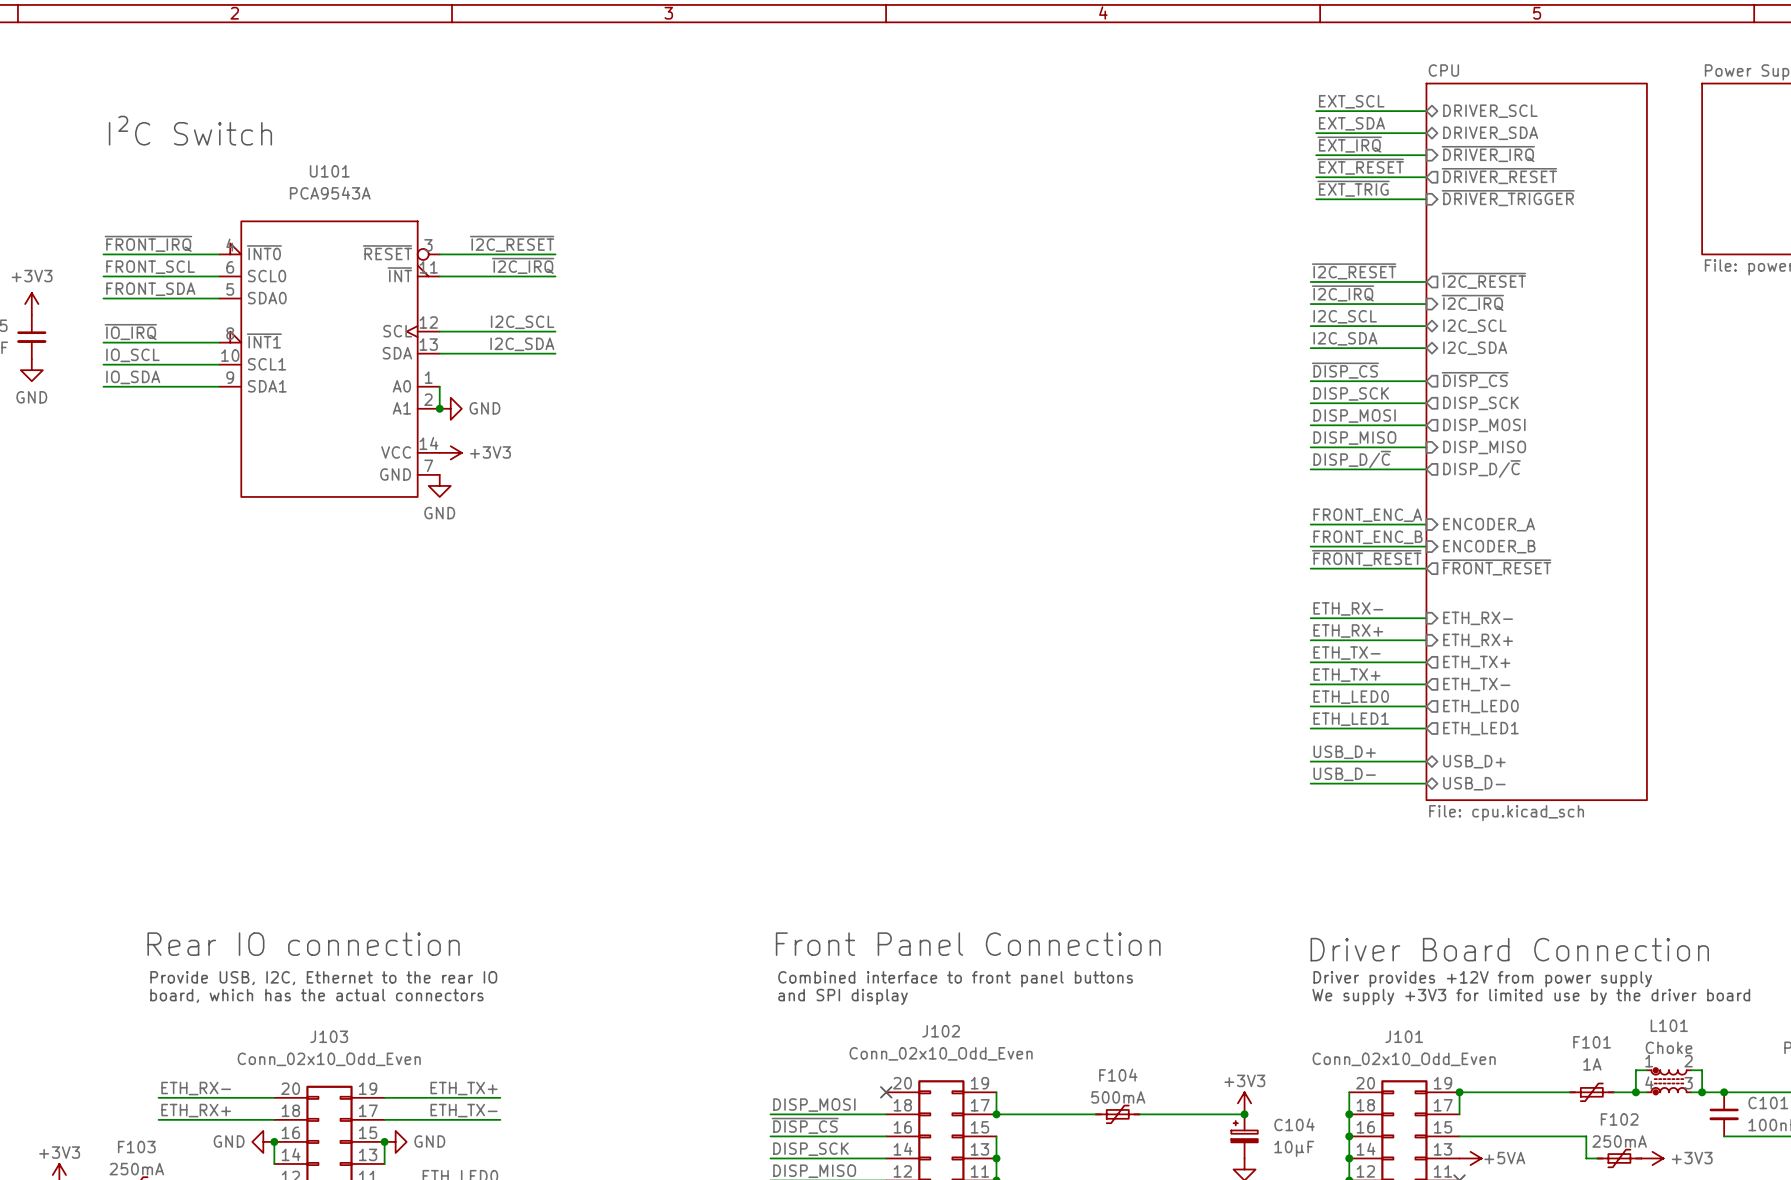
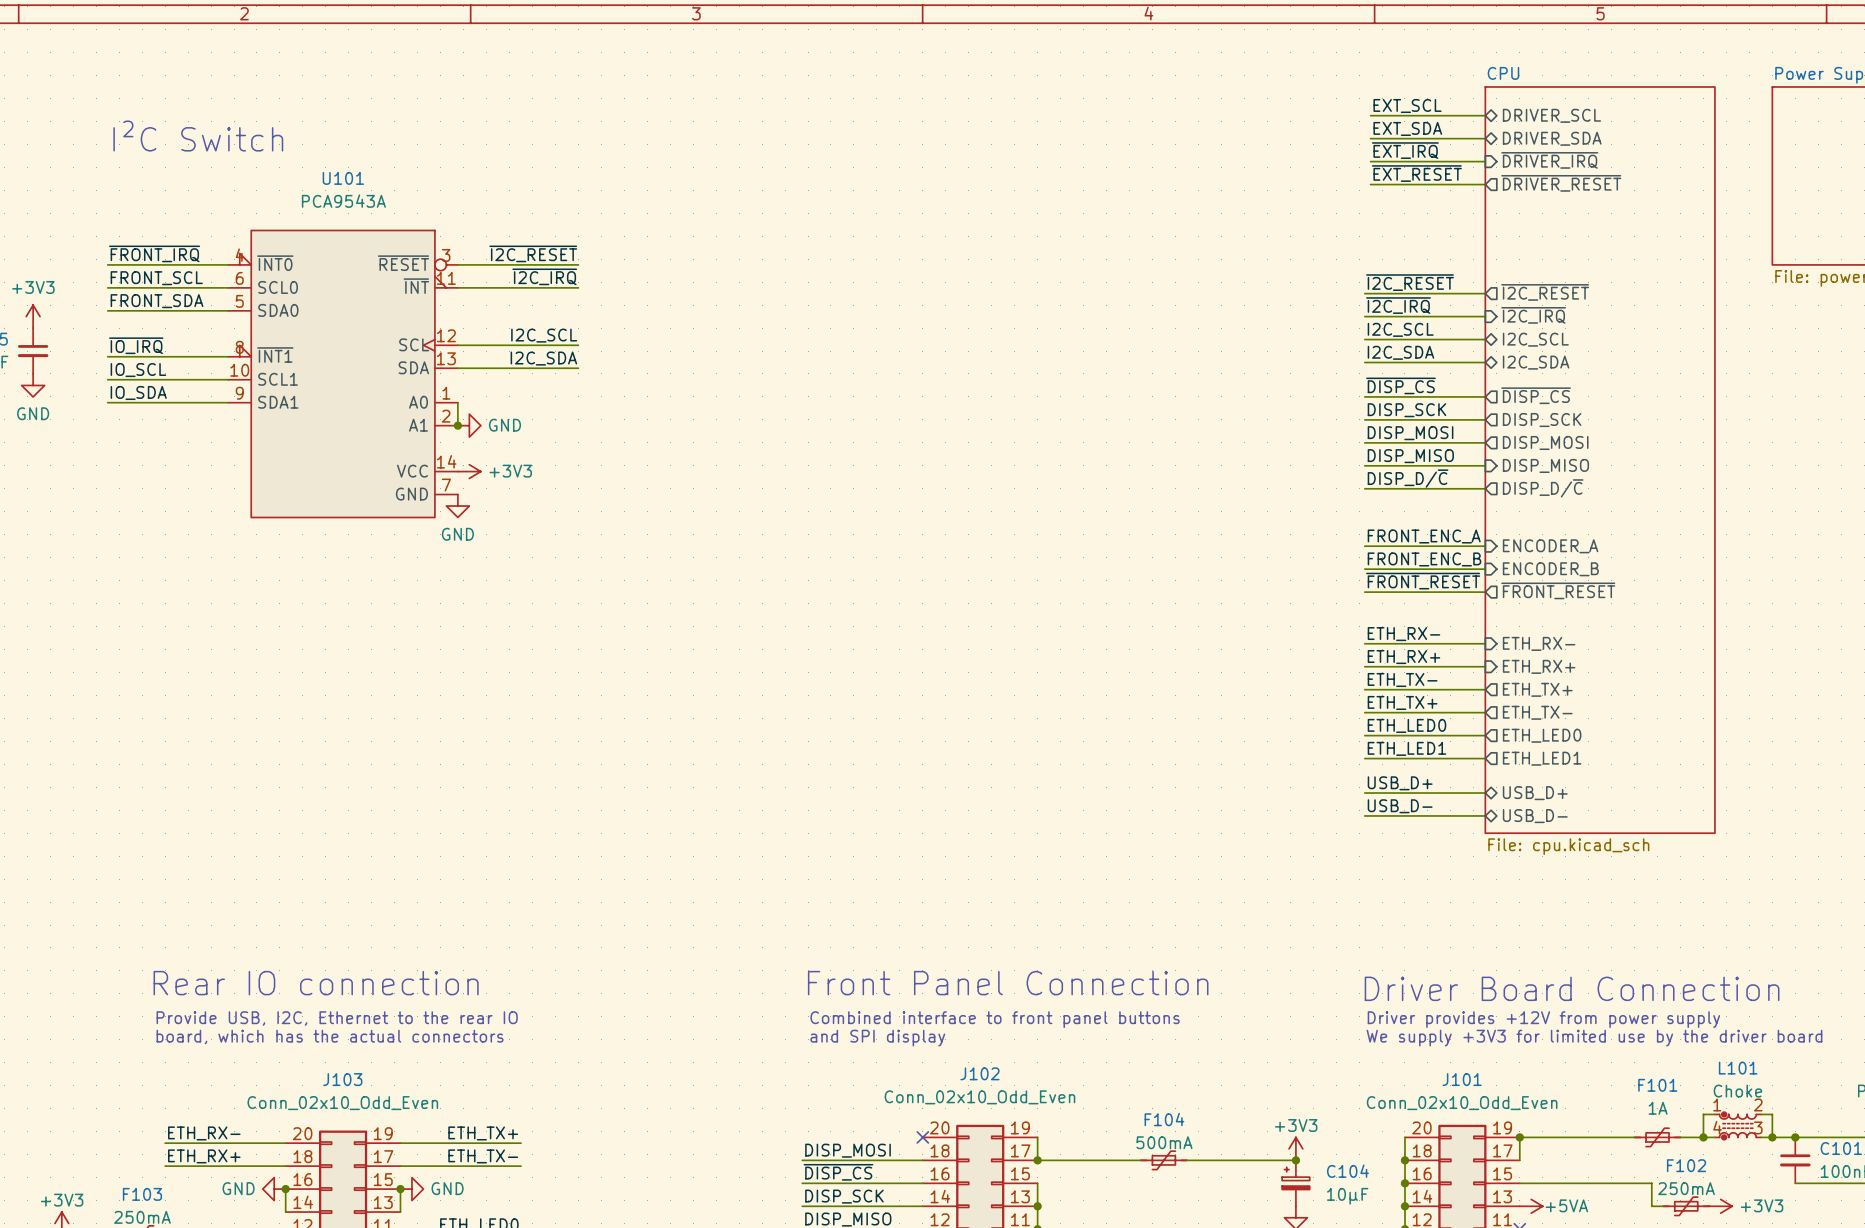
label: ~{EXT_TRIG} (1353, 188) -> none
sheet pin: ~{DRIVER_TRIGGER} (1508, 198) -> none
wire: (1316, 199) (1426, 199) -> none

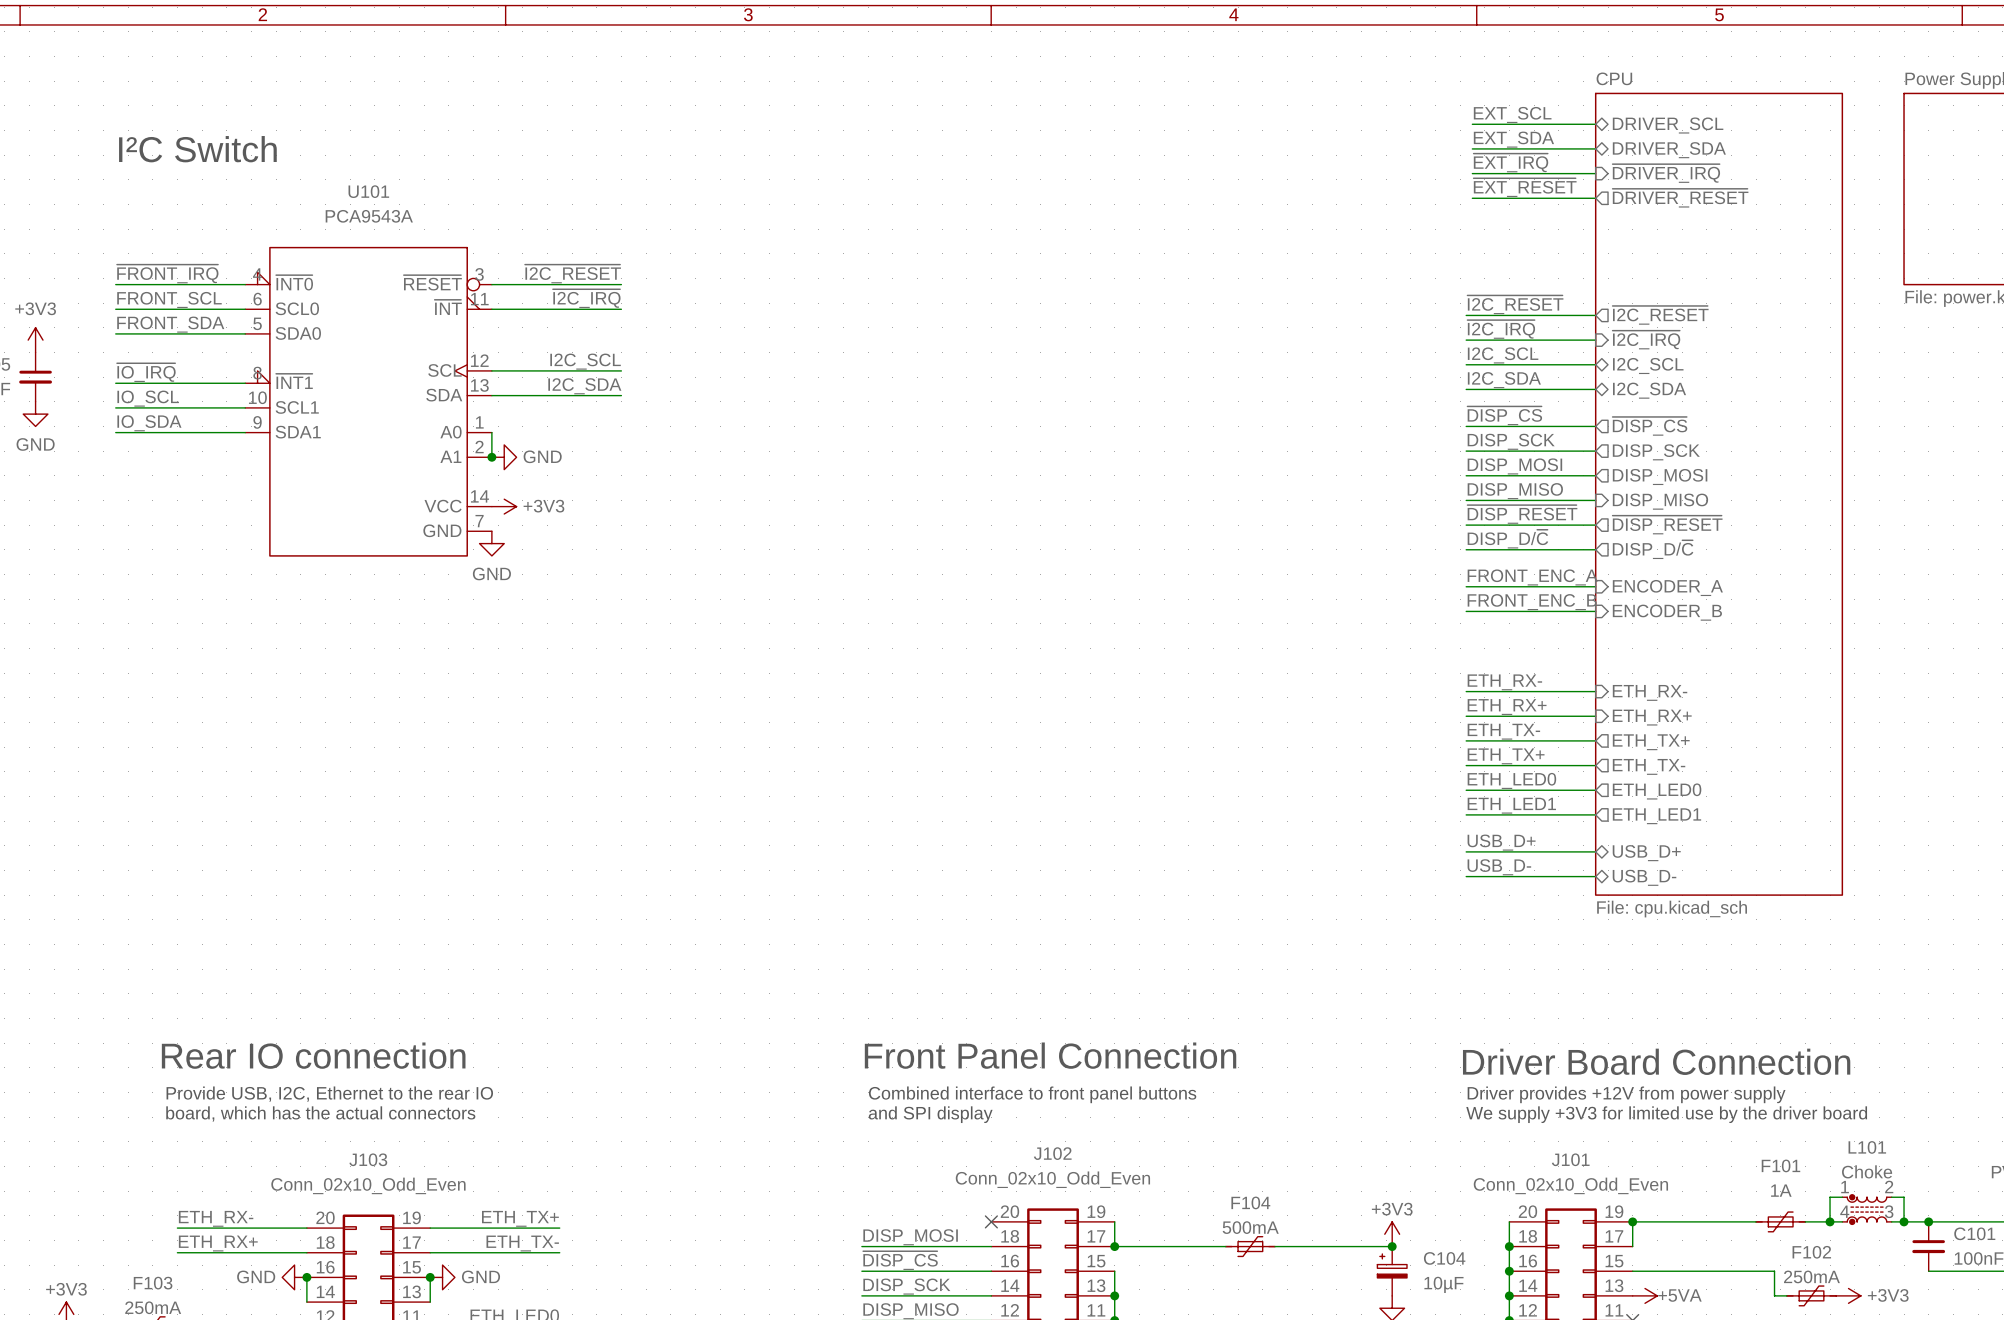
label: DISP_D/~{C} (1408, 478) -> ~{DISP_RESET} (1522, 514)
sheet pin: DISP_D/~{C} (1543, 488) -> ~{DISP_RESET} (1667, 525)
label: none -> DISP_D/~{C} (1507, 539)
sheet pin: none -> DISP_D/~{C} (1653, 549)
label: ~{FRONT_RESET} (1423, 581) -> none
sheet pin: ~{FRONT_RESET} (1558, 590) -> none
wire: (1364, 592) (1485, 592) -> (1466, 549) (1595, 549)

